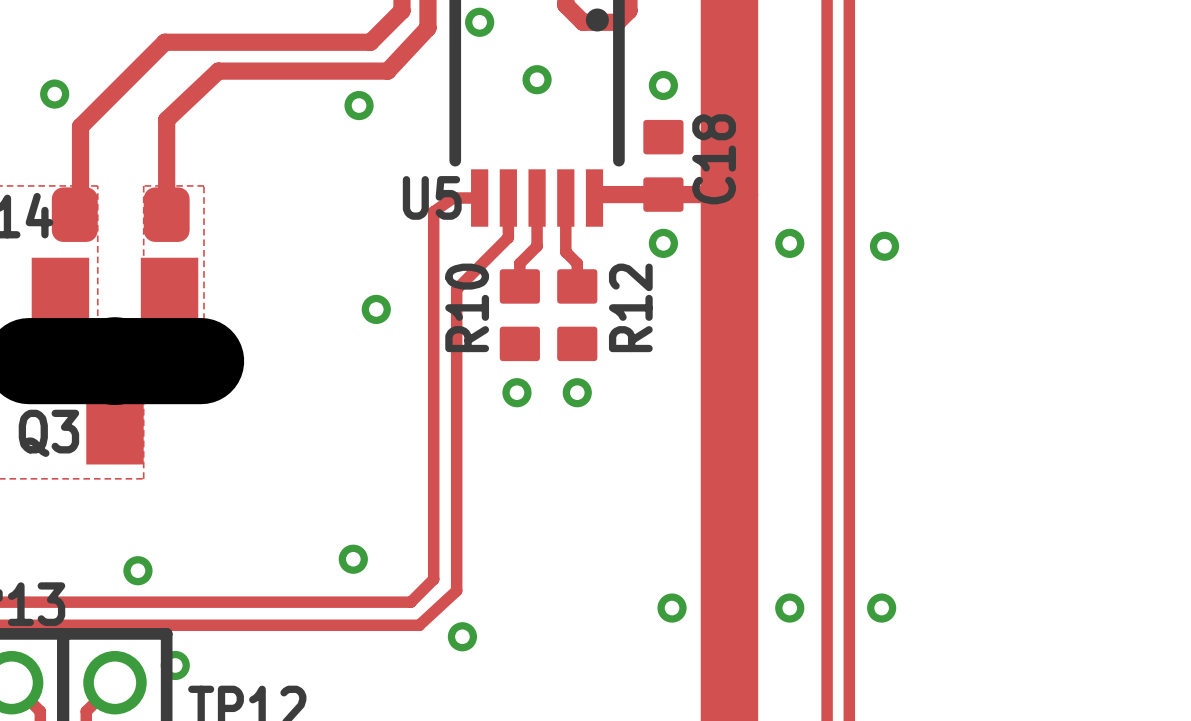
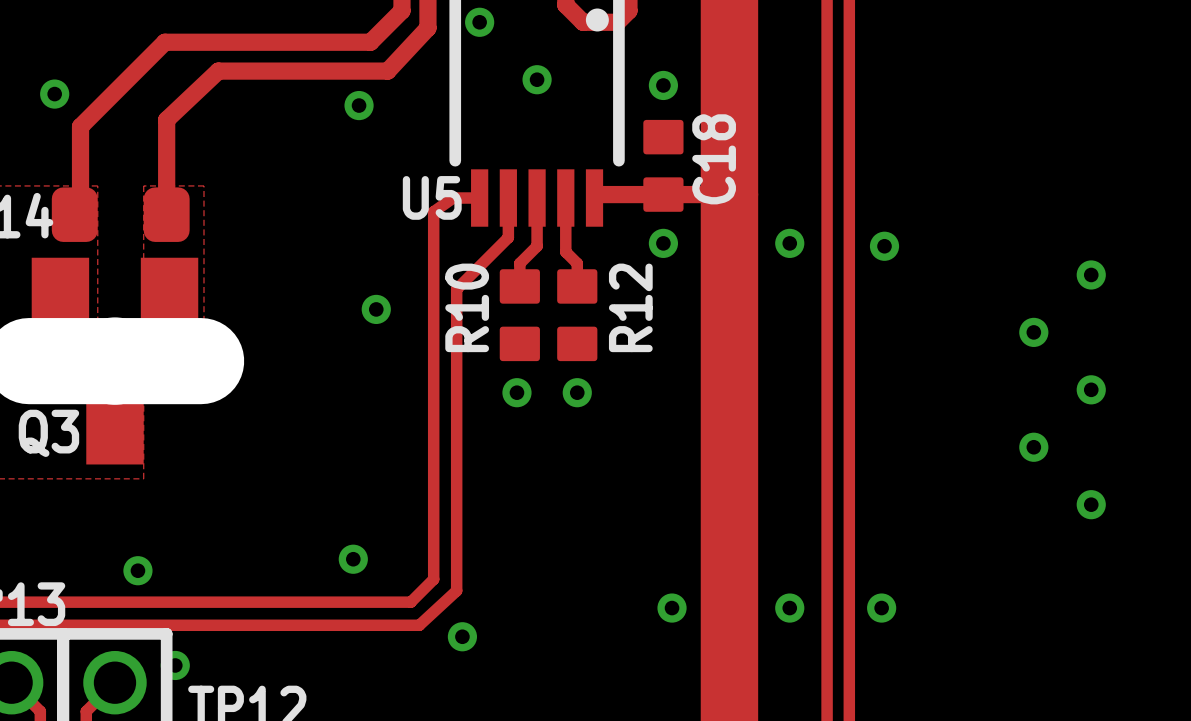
via: none -> (1091, 274)
via: none -> (1033, 332)
via: none -> (1091, 389)
via: none -> (1033, 447)
via: none -> (1091, 504)

